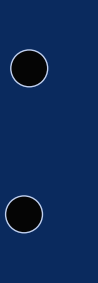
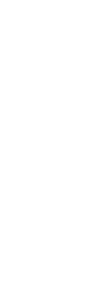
part: (29, 68) -> none
part: (24, 214) -> none

